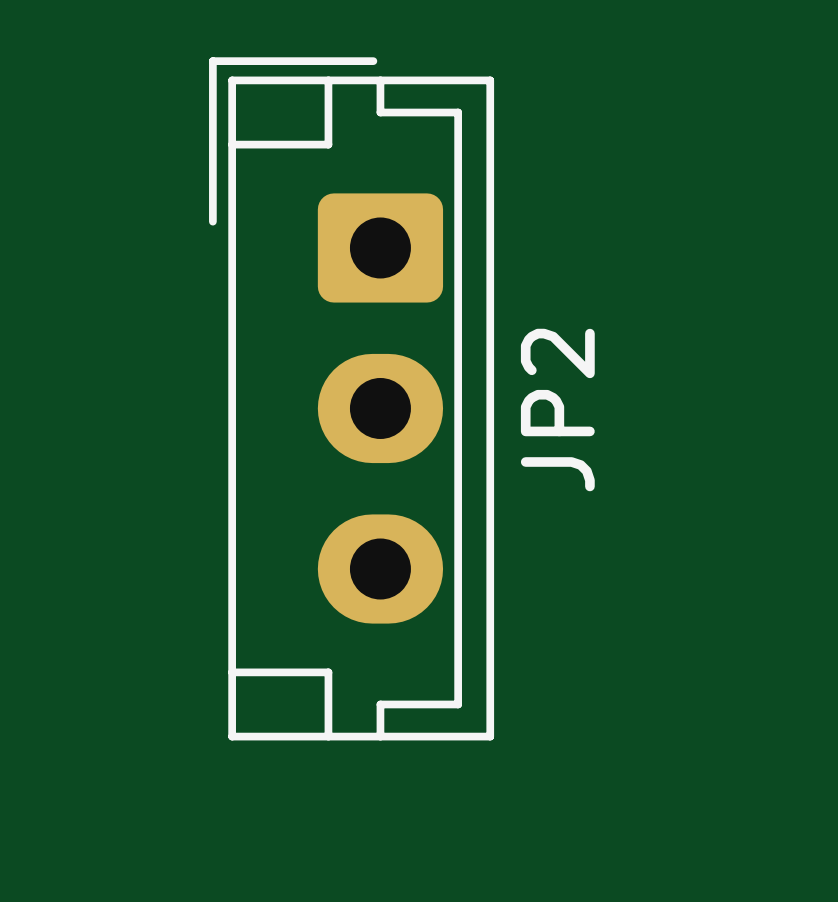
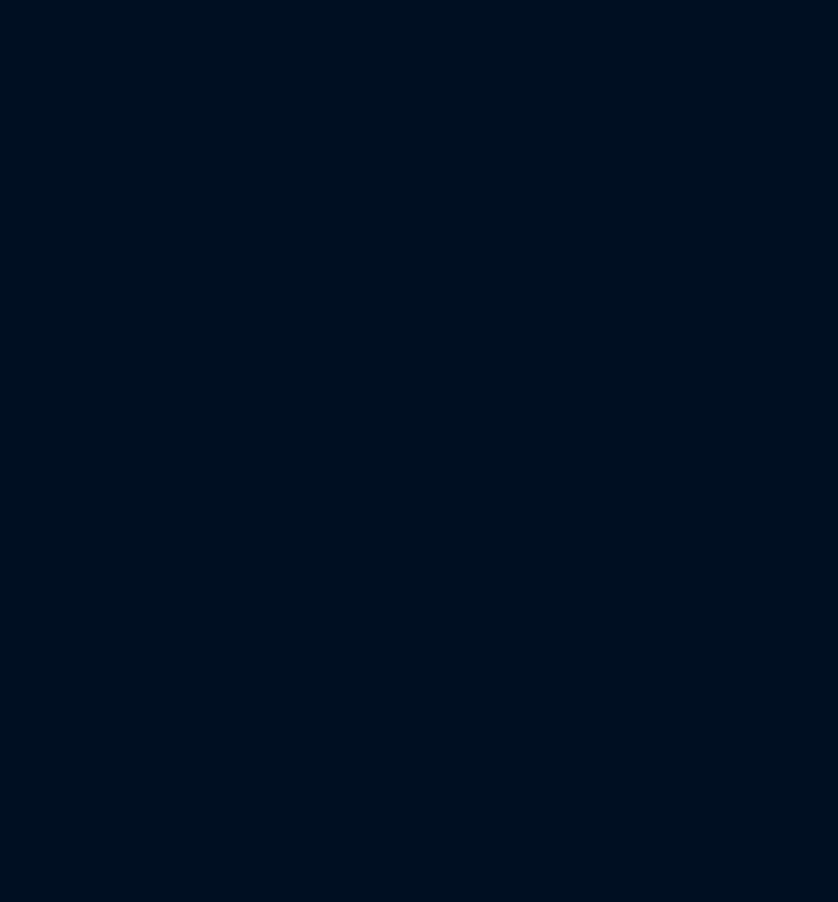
JP2: (351, 398) -> none

